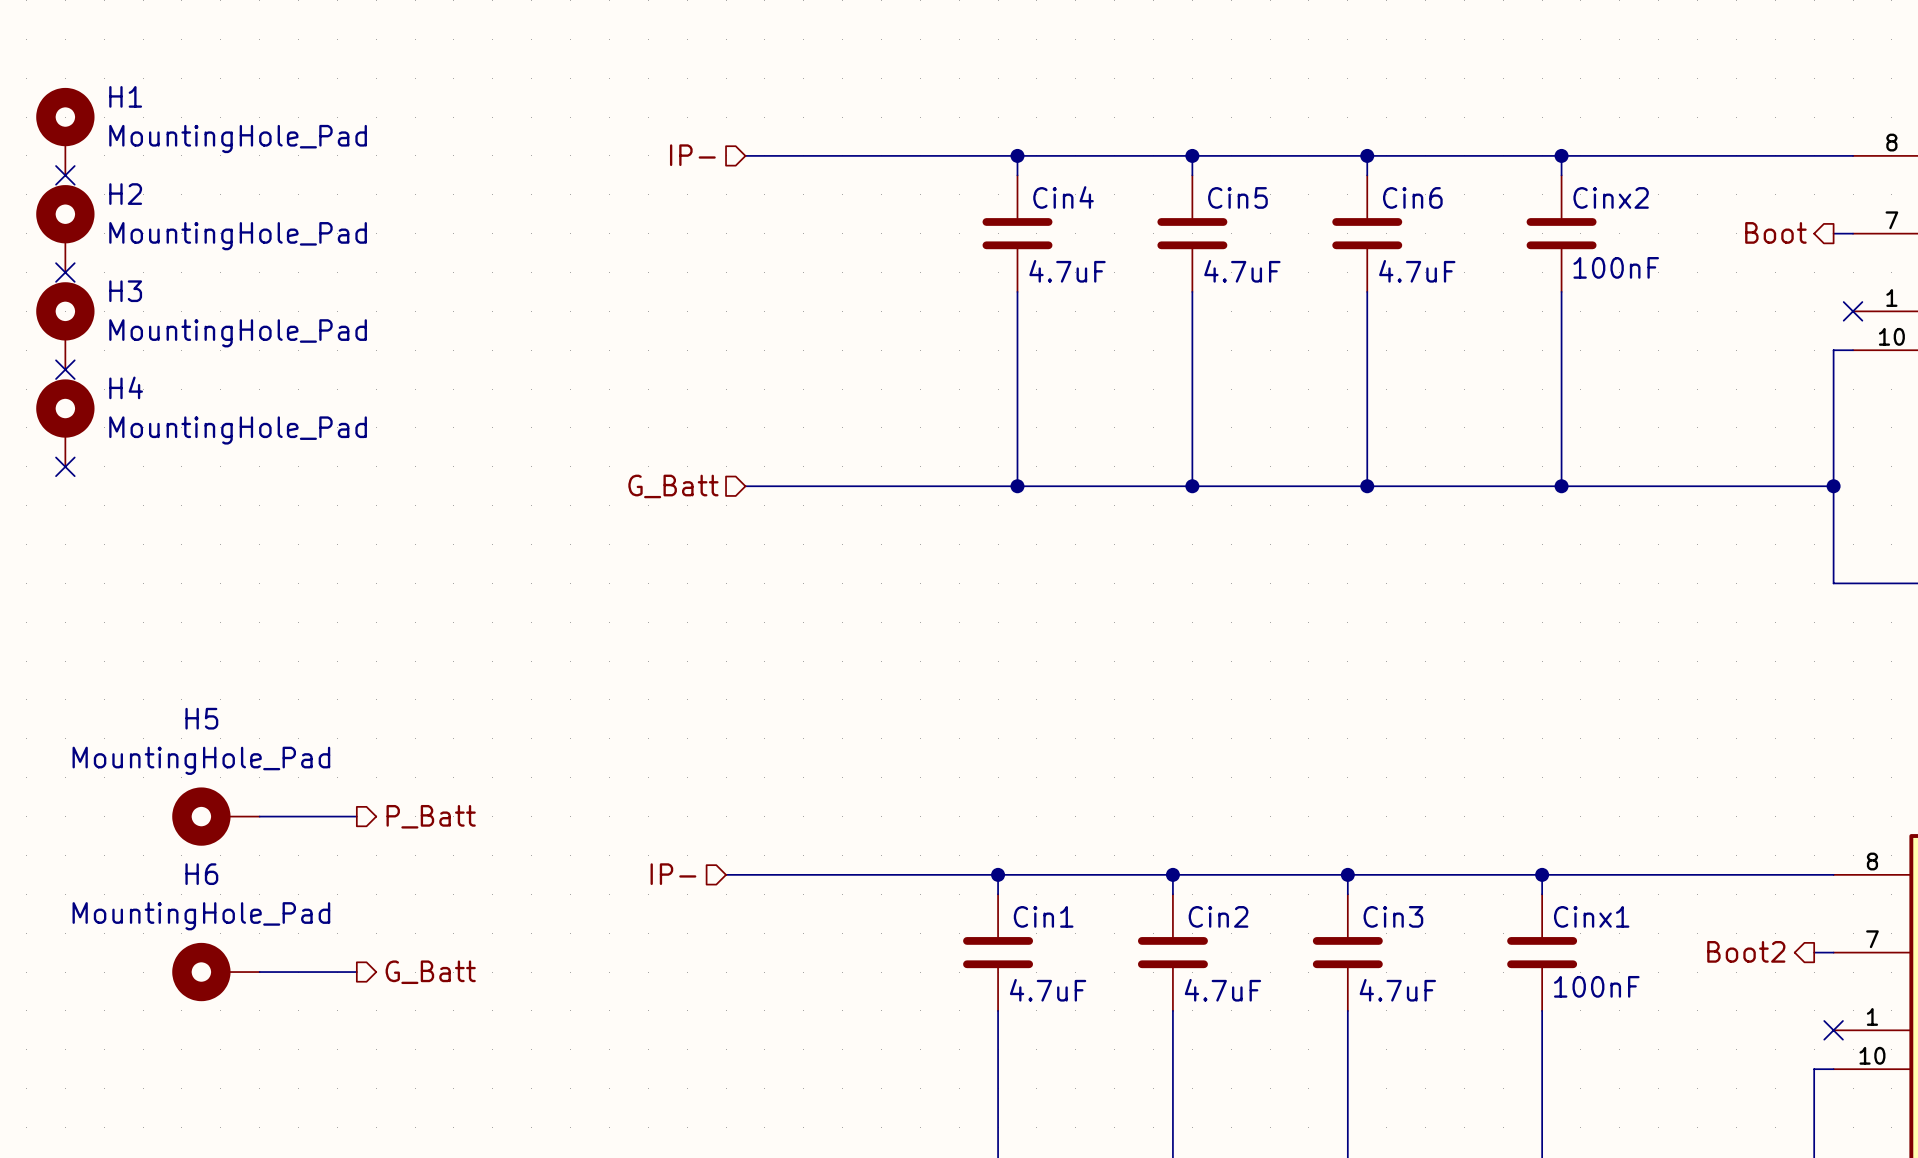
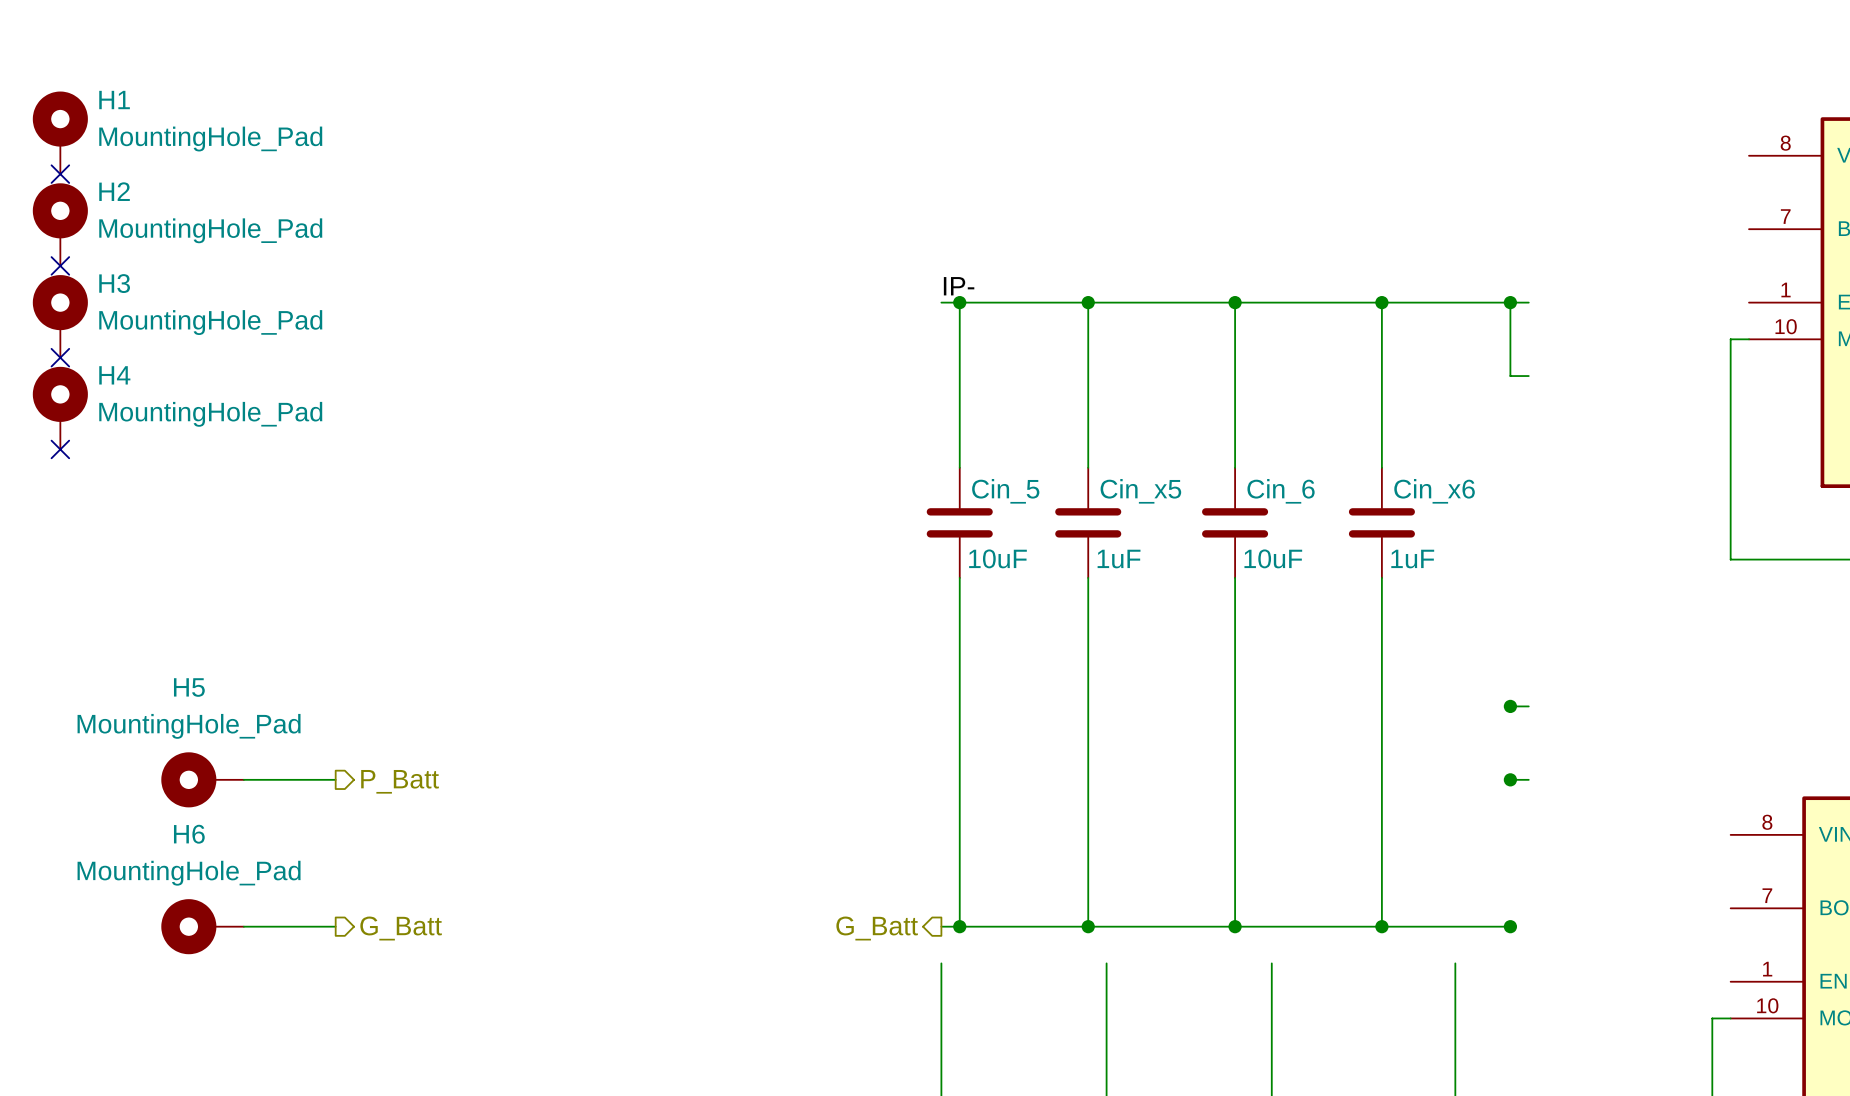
hierarchical label: IP- (692, 155) -> none
wire: (745, 155) (1853, 155) -> none
wire: (1017, 155) (1017, 175) -> none
junction: (1017, 155) -> none
wire: (1192, 155) (1192, 175) -> none
junction: (1192, 155) -> none
wire: (1367, 155) (1367, 175) -> none
junction: (1367, 155) -> none
wire: (1561, 155) (1561, 175) -> none
junction: (1561, 155) -> none
hierarchical label: Boot (1775, 232) -> none
Cin4: 4.7uF (1017, 233) -> none
Cin5: 4.7uF (1192, 233) -> none
Cin6: 4.7uF (1367, 233) -> none
Cinx2: 100nF (1561, 233) -> none
wire: (1833, 233) (1853, 233) -> none
wire: (1017, 291) (1017, 311) -> none
wire: (1192, 291) (1192, 486) -> none
wire: (1367, 291) (1367, 486) -> none
wire: (1561, 291) (1561, 486) -> none
label: none -> IP- (959, 286)
wire: none -> (941, 302) (1528, 302)
junction: none -> (959, 302)
wire: none -> (1088, 302) (1088, 467)
junction: none -> (1088, 302)
wire: none -> (1235, 302) (1235, 467)
junction: none -> (1235, 302)
wire: none -> (1381, 302) (1381, 467)
junction: none -> (1381, 302)
wire: none -> (1510, 302) (1510, 376) (1528, 376)
junction: none -> (1510, 302)
no-connect mark: (1853, 311) -> none
hierarchical label: G_Batt (673, 486) -> none
wire: (745, 486) (1833, 486) -> none
junction: (1017, 486) -> none
junction: (1192, 486) -> none
junction: (1367, 486) -> none
junction: (1561, 486) -> none
junction: (1833, 486) -> none
Cin_5: none -> 10uF (959, 522)
Cin_x5: none -> 1uF (1088, 522)
Cin_6: none -> 10uF (1235, 522)
Cin_x6: none -> 1uF (1381, 522)
wire: none -> (959, 577) (959, 926)
wire: none -> (1088, 577) (1088, 926)
wire: none -> (1235, 577) (1235, 926)
wire: none -> (1381, 577) (1381, 926)
wire: none -> (1510, 706) (1528, 706)
junction: none -> (1510, 706)
junction: none -> (1510, 779)
hierarchical label: IP- (673, 874) -> none
wire: (726, 874) (1833, 874) -> none
wire: (998, 874) (998, 894) -> none
junction: (998, 874) -> none
wire: (1172, 874) (1172, 894) -> none
junction: (1172, 874) -> none
wire: (1347, 874) (1347, 894) -> none
junction: (1347, 874) -> none
wire: (1542, 874) (1542, 894) -> none
junction: (1542, 874) -> none
hierarchical label: Boot2 (1746, 951) -> none
Cin1: 4.7uF (998, 952) -> none
Cin2: 4.7uF (1172, 952) -> none
Cin3: 4.7uF (1347, 952) -> none
Cinx1: 100nF (1542, 952) -> none
wire: (1814, 952) (1833, 952) -> (1510, 779) (1528, 779)
hierarchical label: none -> G_Batt (877, 928)
wire: none -> (941, 926) (1510, 926)
junction: none -> (959, 926)
junction: none -> (1088, 926)
junction: none -> (1235, 926)
junction: none -> (1381, 926)
junction: none -> (1510, 926)
no-connect mark: (1833, 1030) -> none

